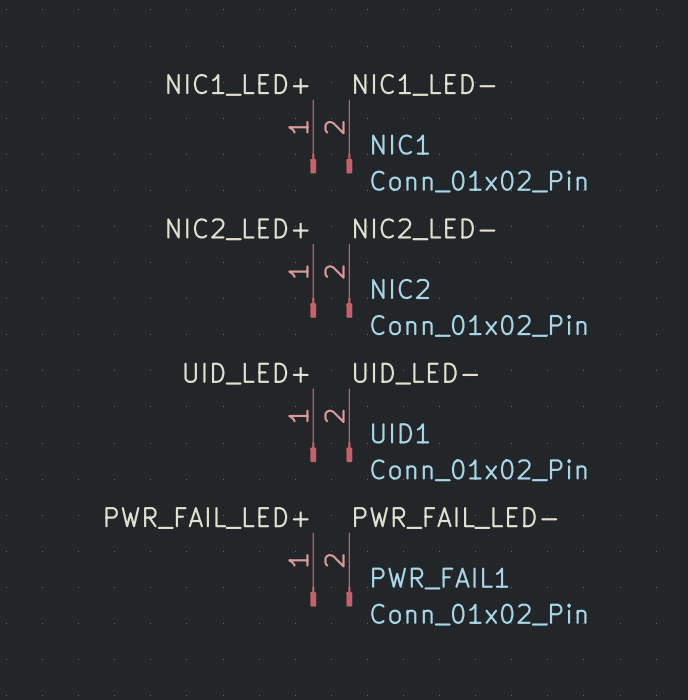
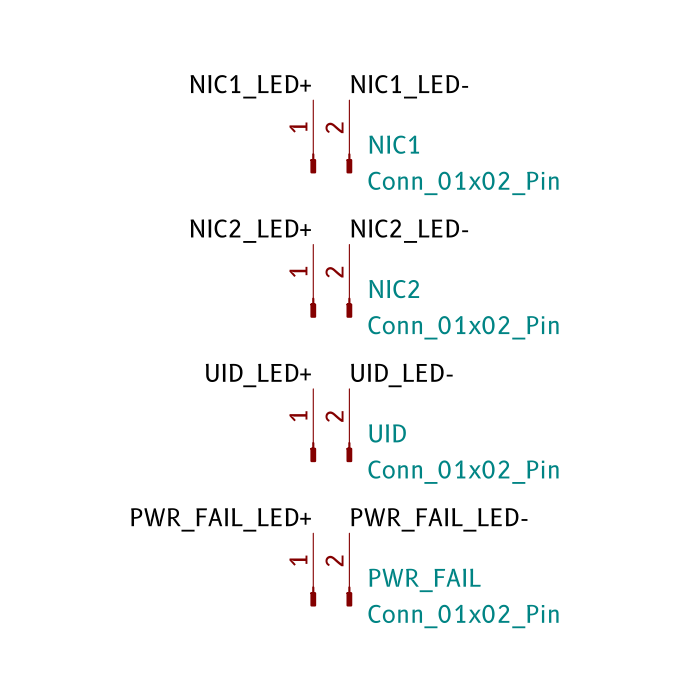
UID1 name: UID1 (400, 433) -> UID (387, 433)
PWR_FAIL1 name: PWR_FAIL1 (440, 578) -> PWR_FAIL (424, 580)

